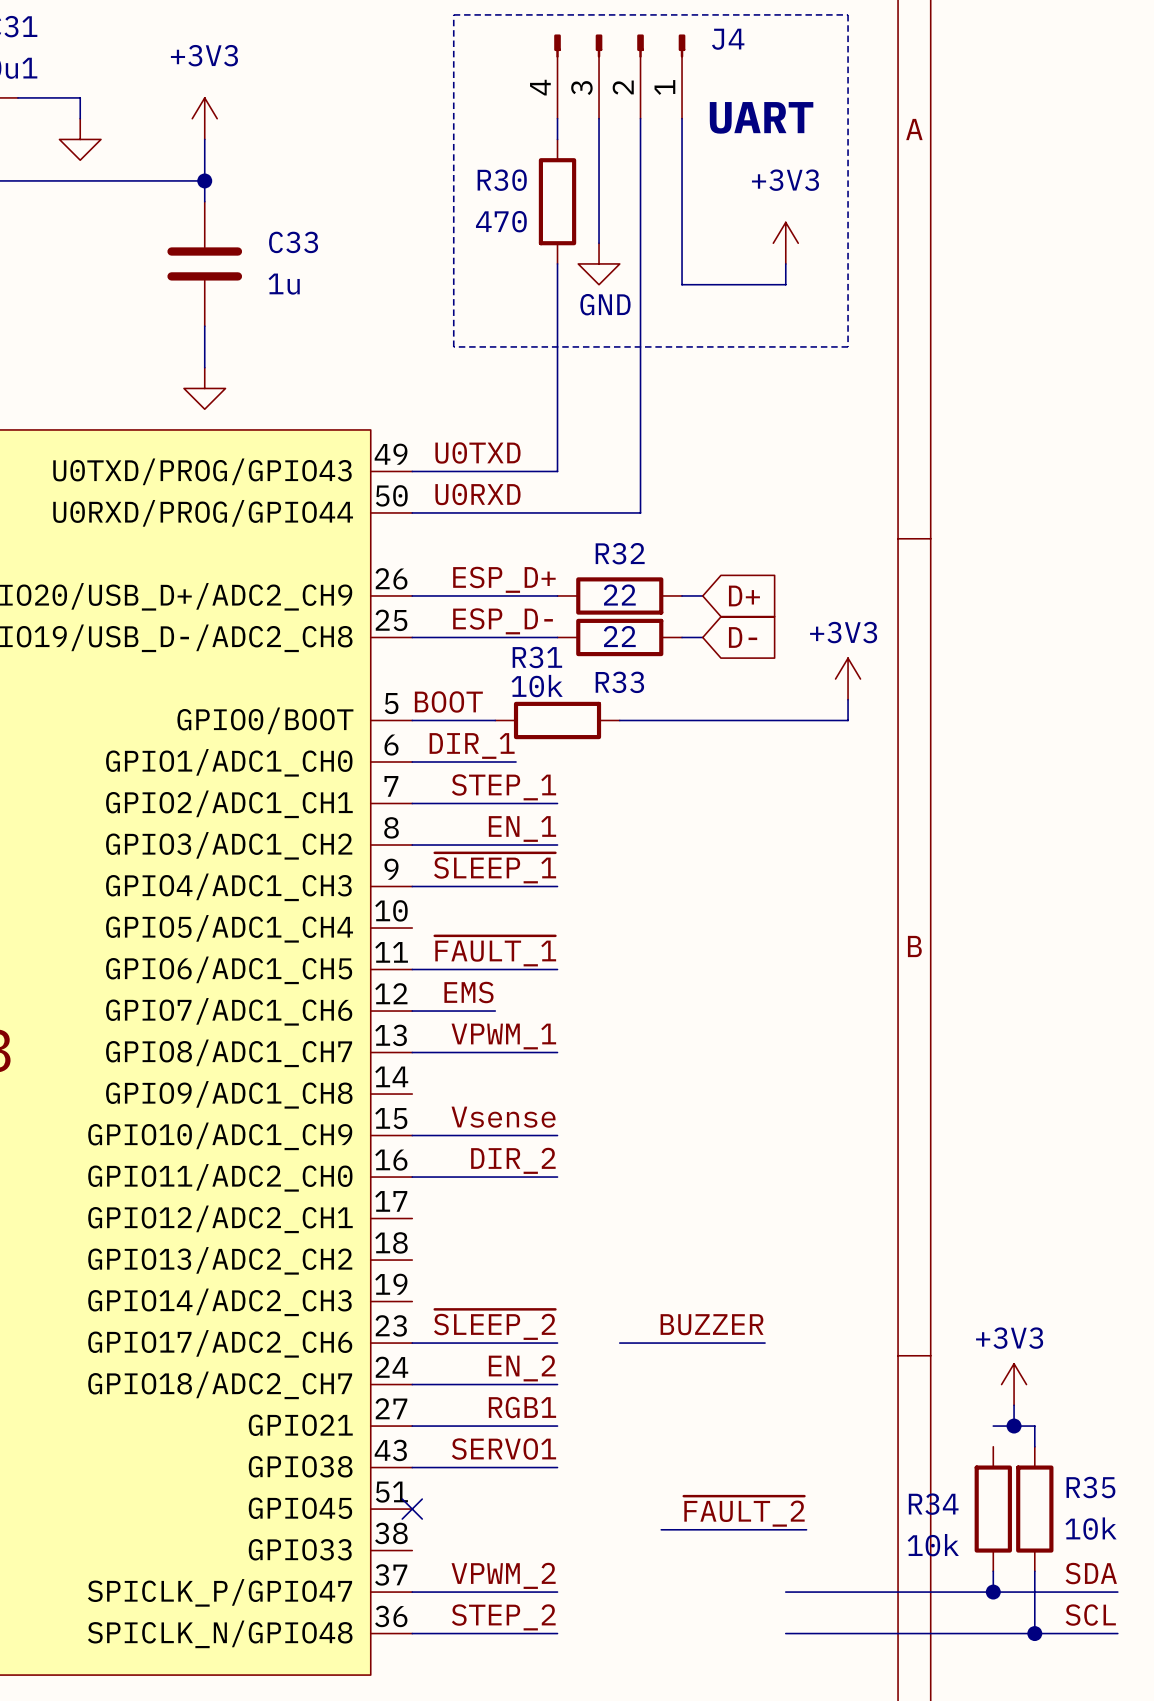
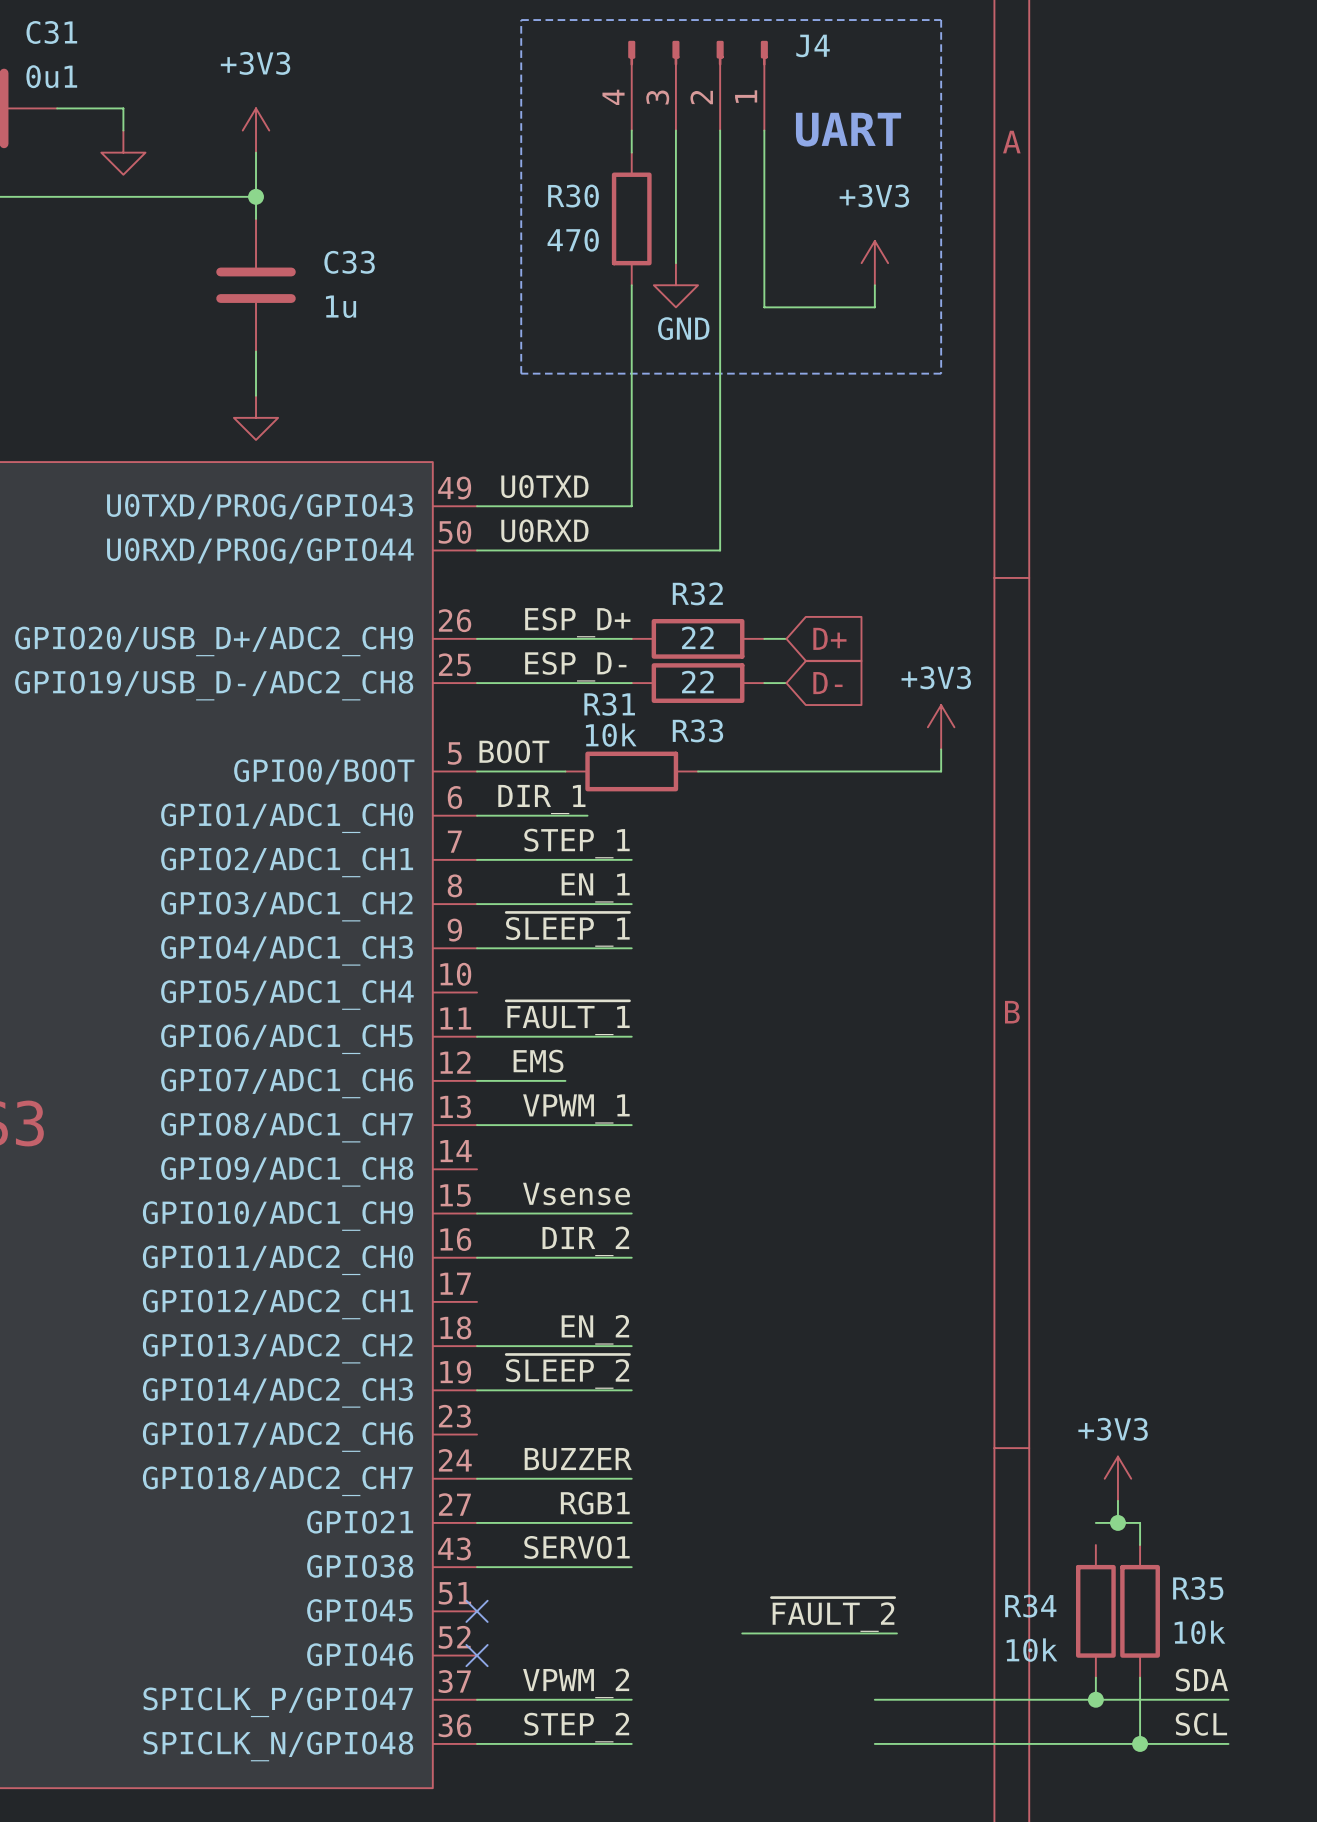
label: none -> EN_2 (595, 1329)
label position: ~{SLEEP_2} (494, 1324) -> ~{SLEEP_2} (567, 1371)
label: BUZZER (712, 1324) -> none
wire: (412, 1343) (557, 1343) -> (477, 1390) (631, 1390)
wire: (619, 1343) (765, 1343) -> (477, 1346) (631, 1346)
label: EN_2 (522, 1368) -> BUZZER (578, 1459)
part pin number: 38 (391, 1533) -> 52 (454, 1637)
part pin name: GPIO33 (300, 1549) -> GPIO46 (360, 1654)
no-connect mark: none -> (477, 1655)

